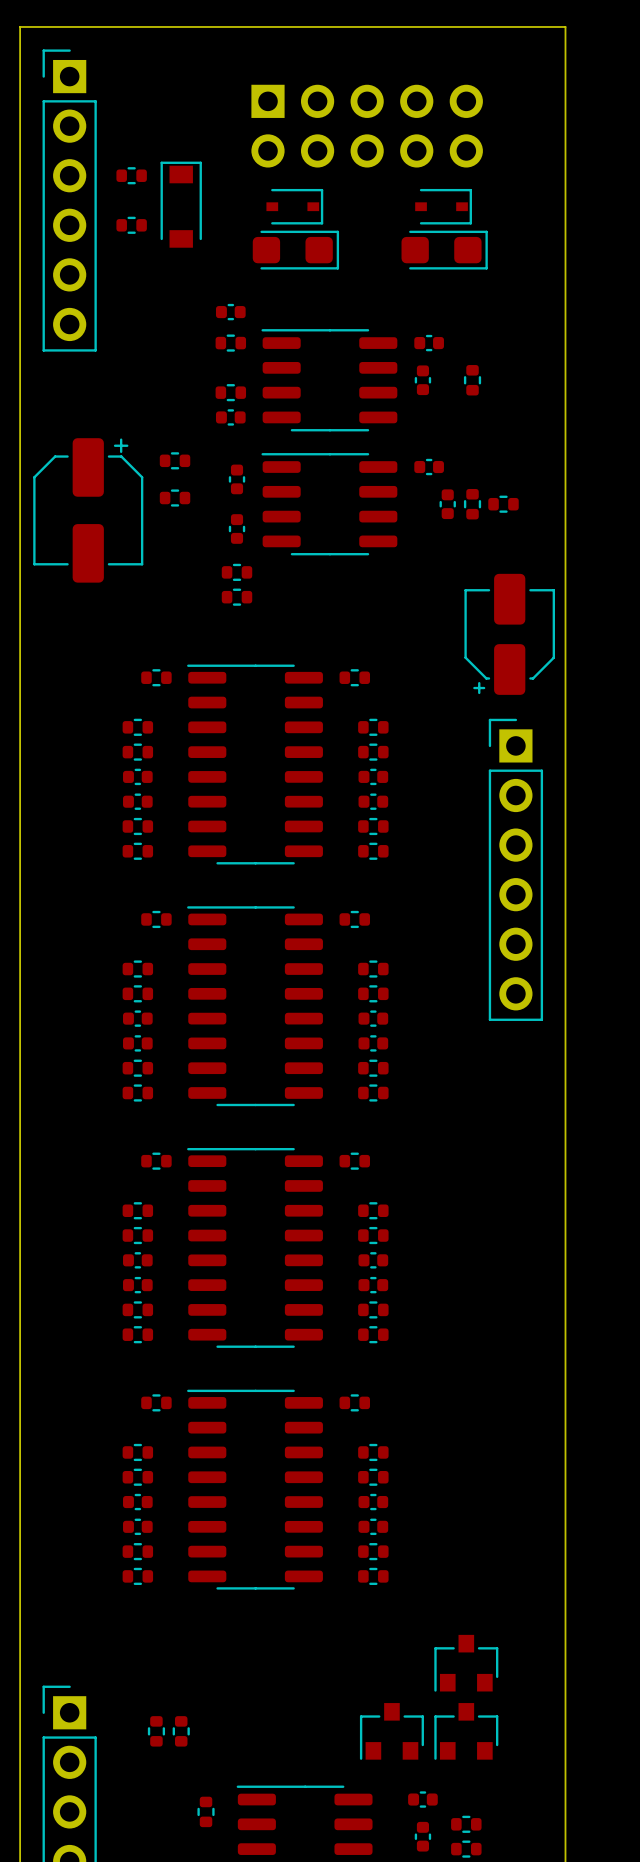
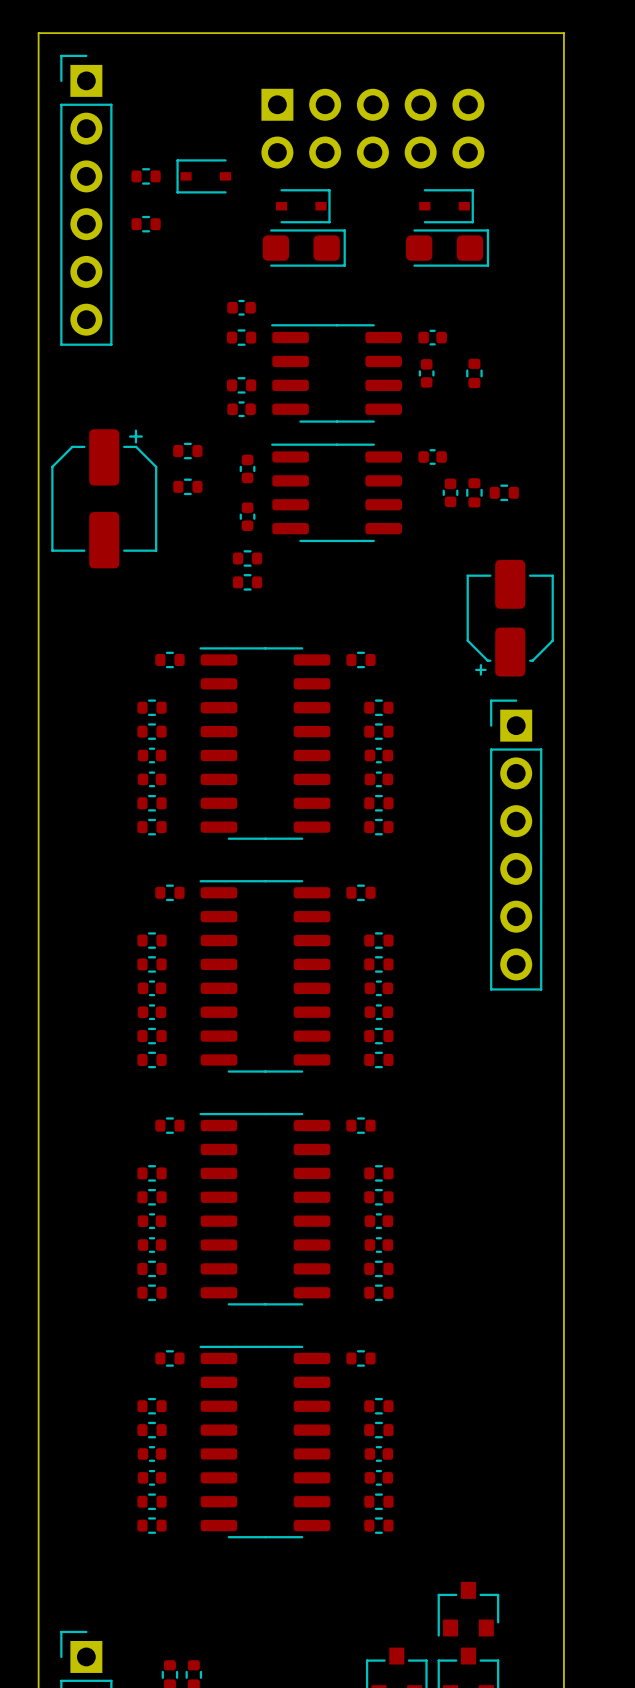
part: none -> (203, 176)
part: (181, 204) -> none

